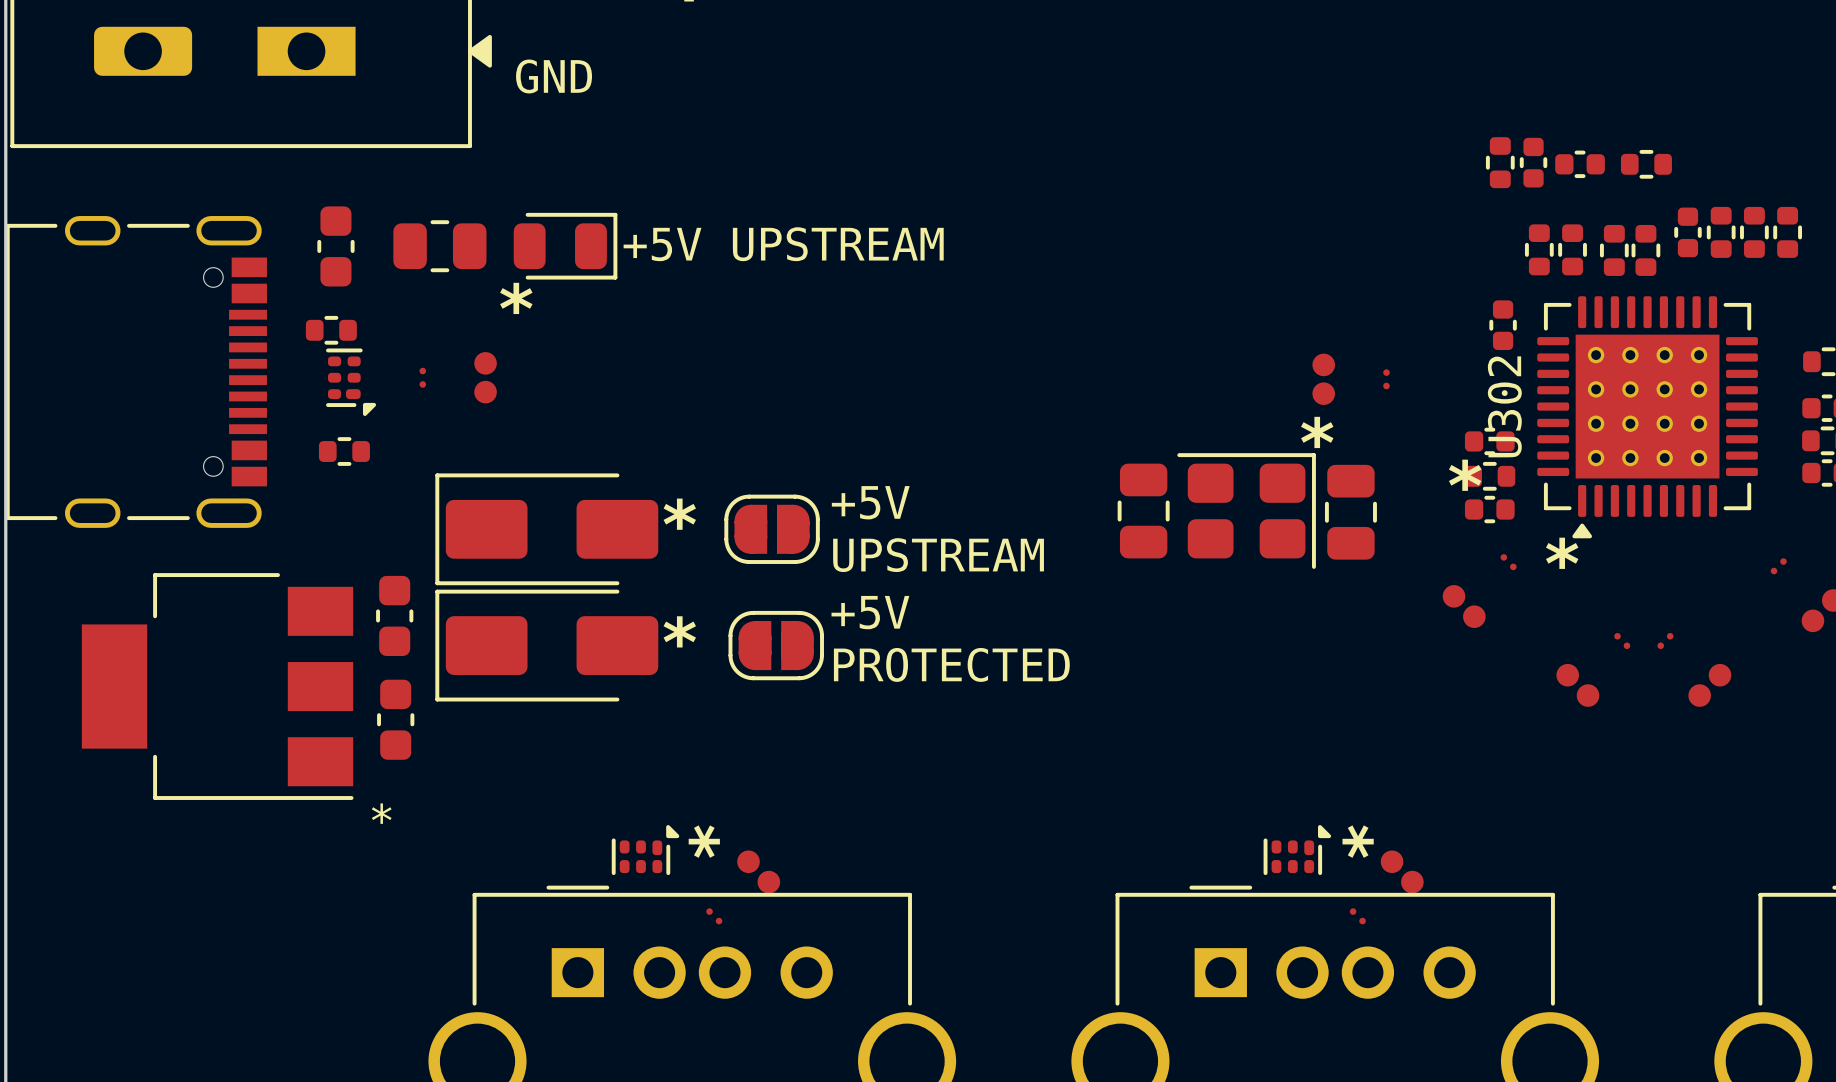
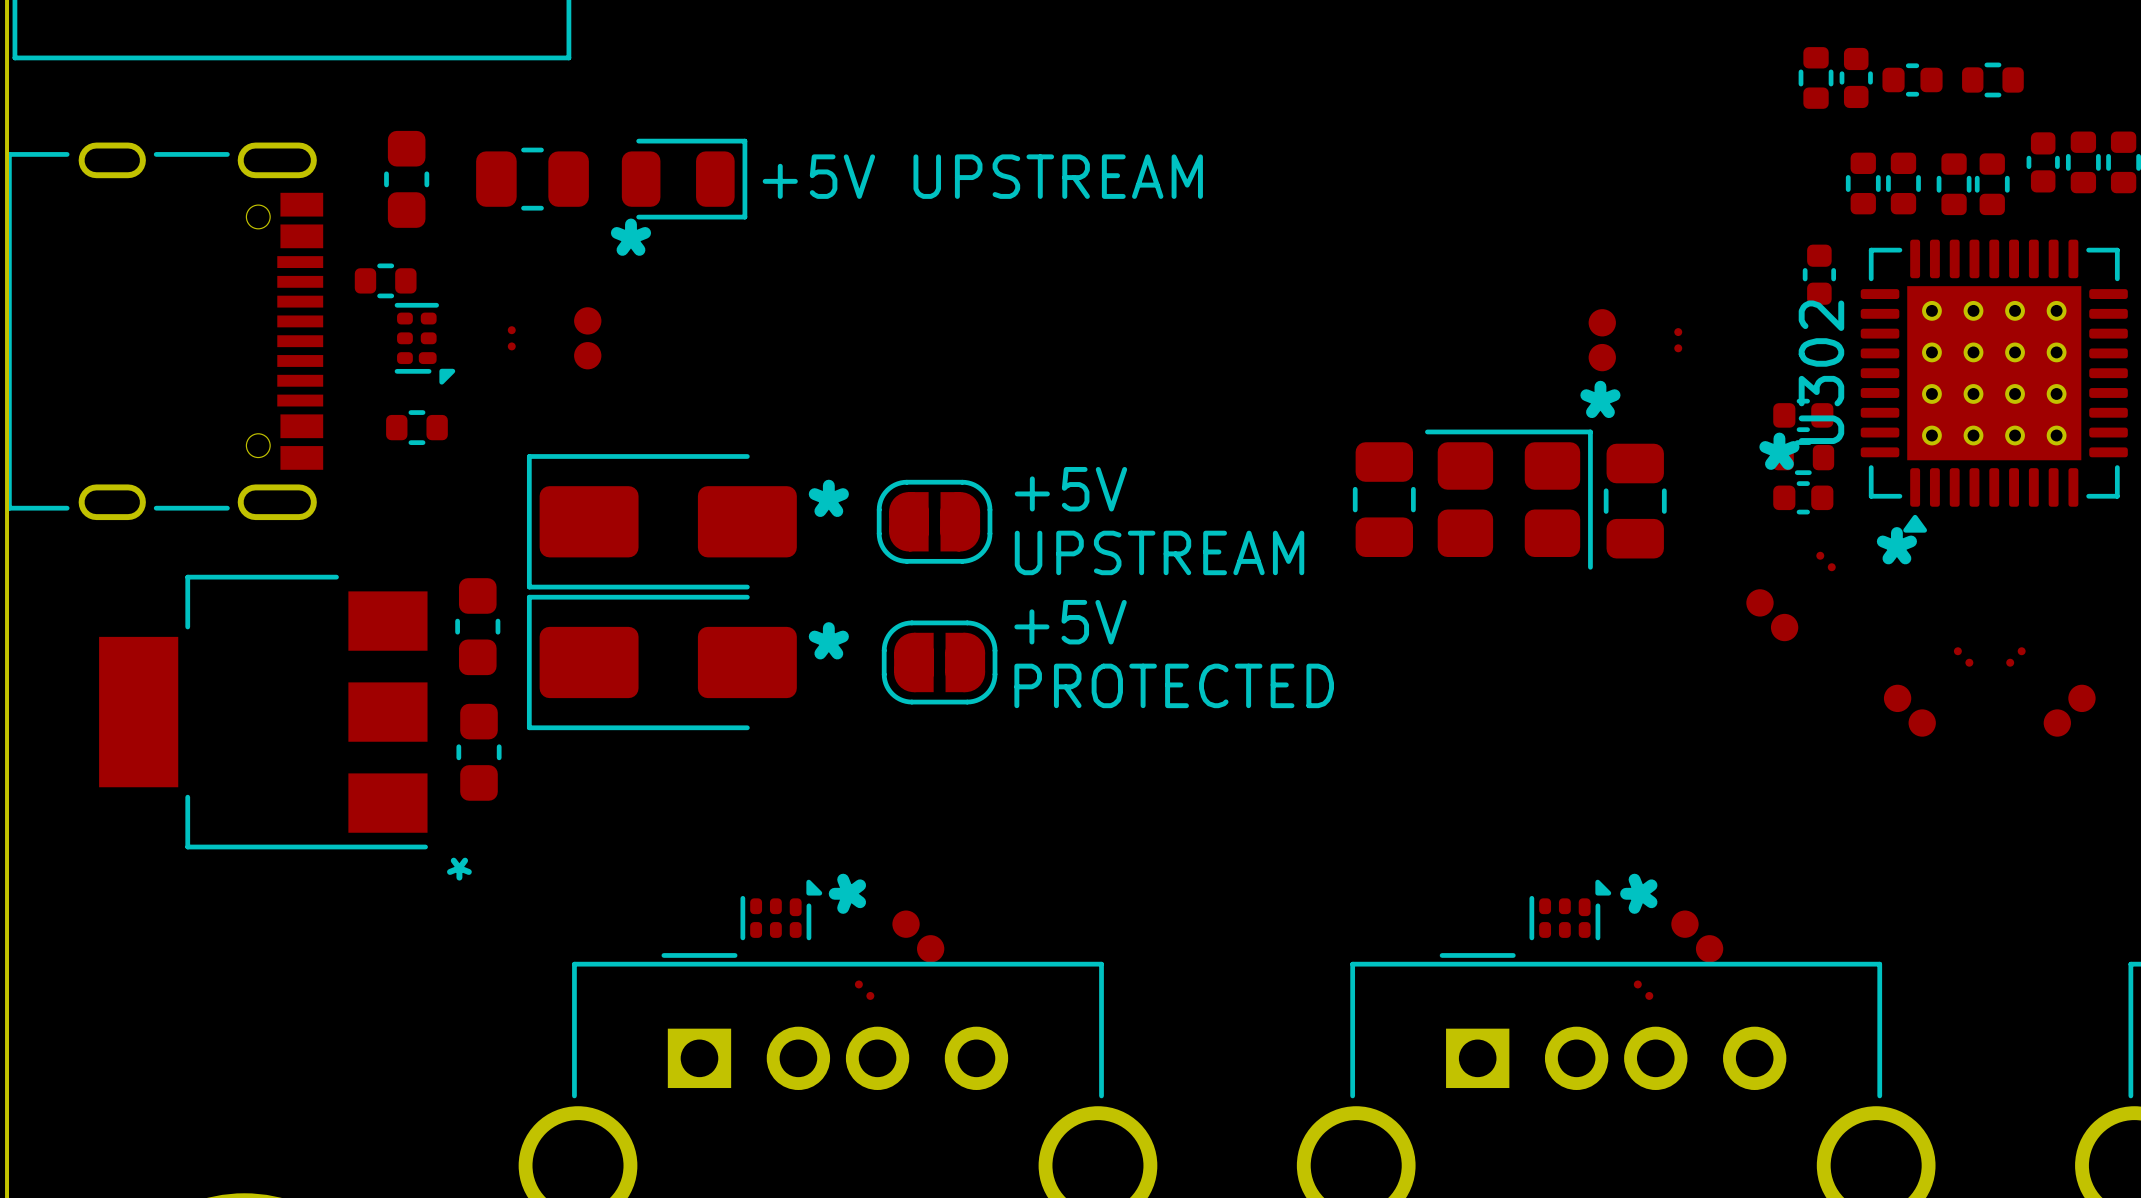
part position: (331, 330) -> (385, 280)

